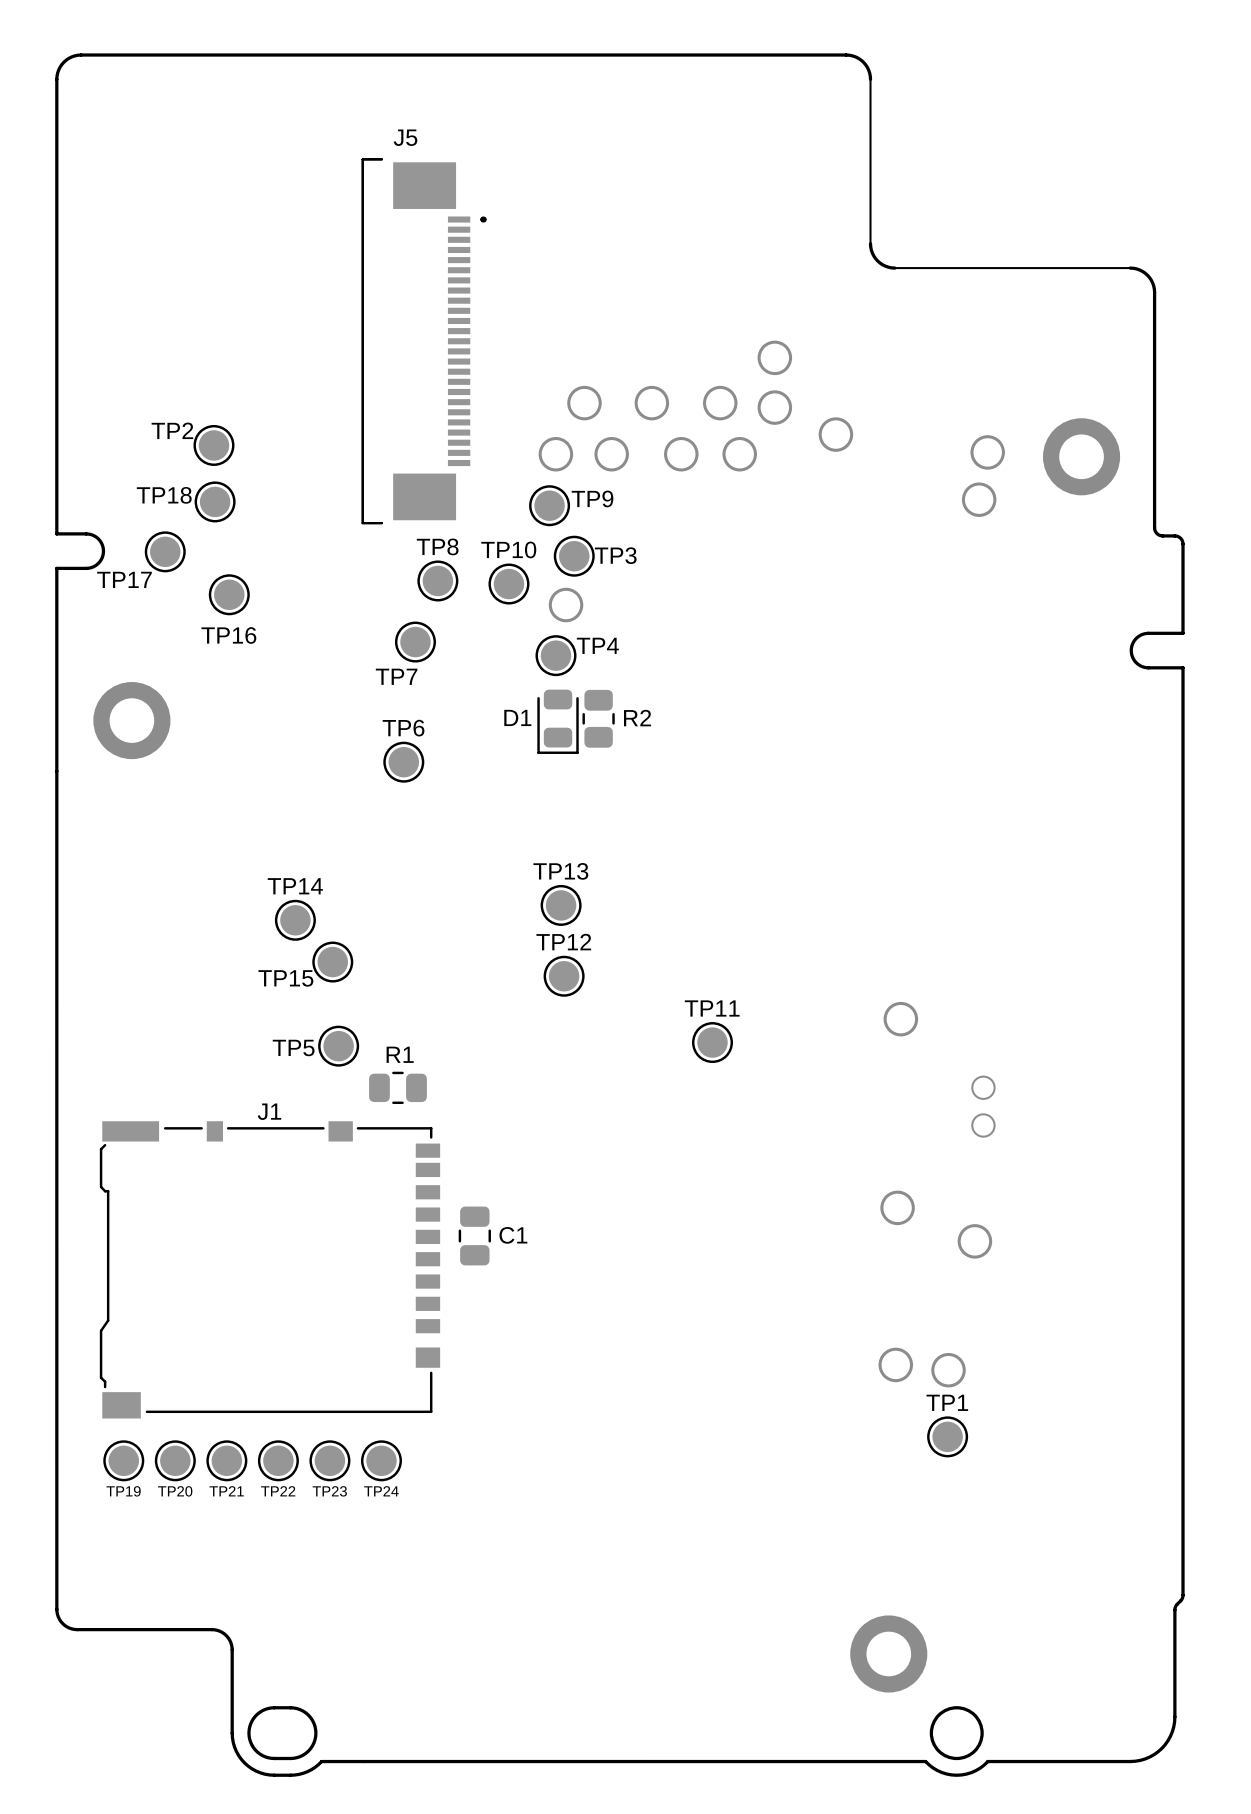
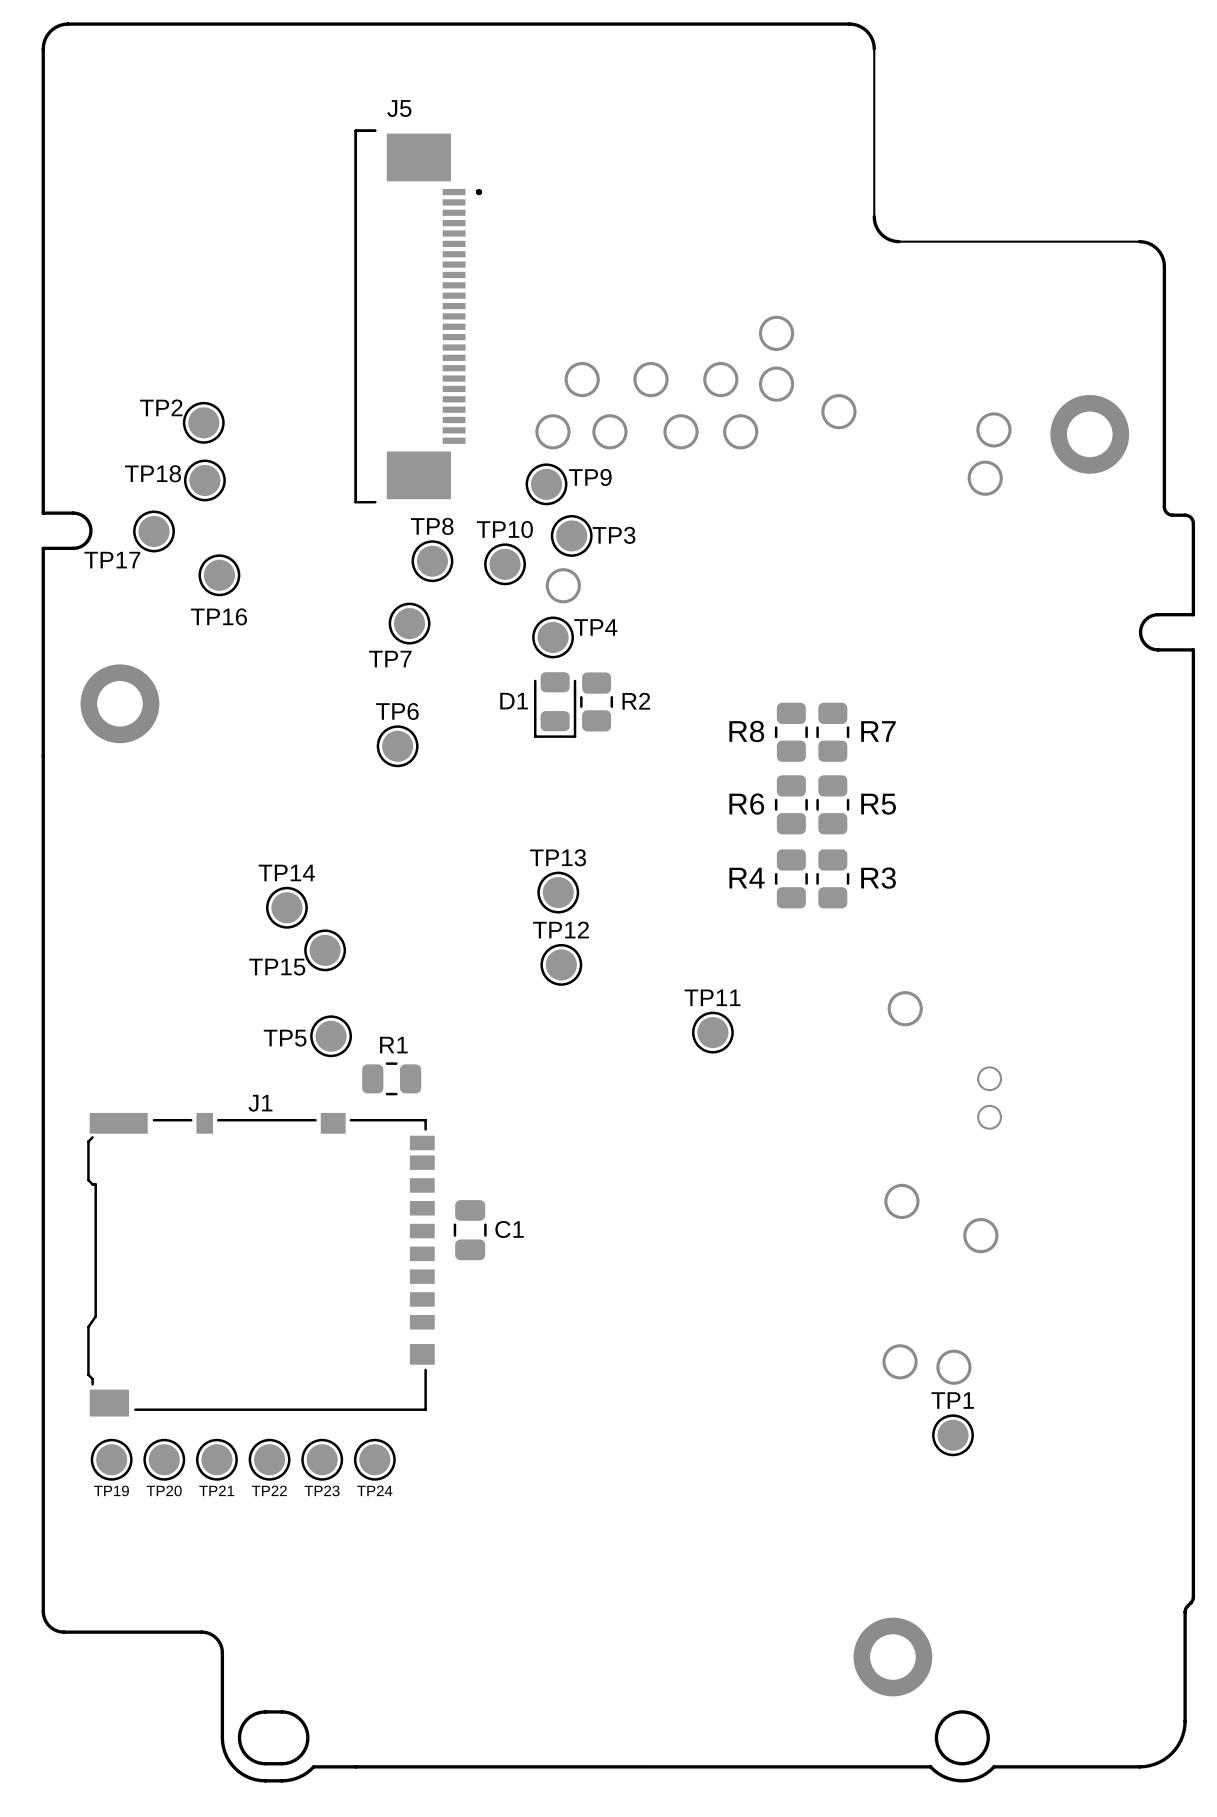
R8: none -> (791, 732)
R7: none -> (832, 732)
R6: none -> (791, 804)
R5: none -> (832, 804)
R4: none -> (791, 878)
R3: none -> (832, 878)

